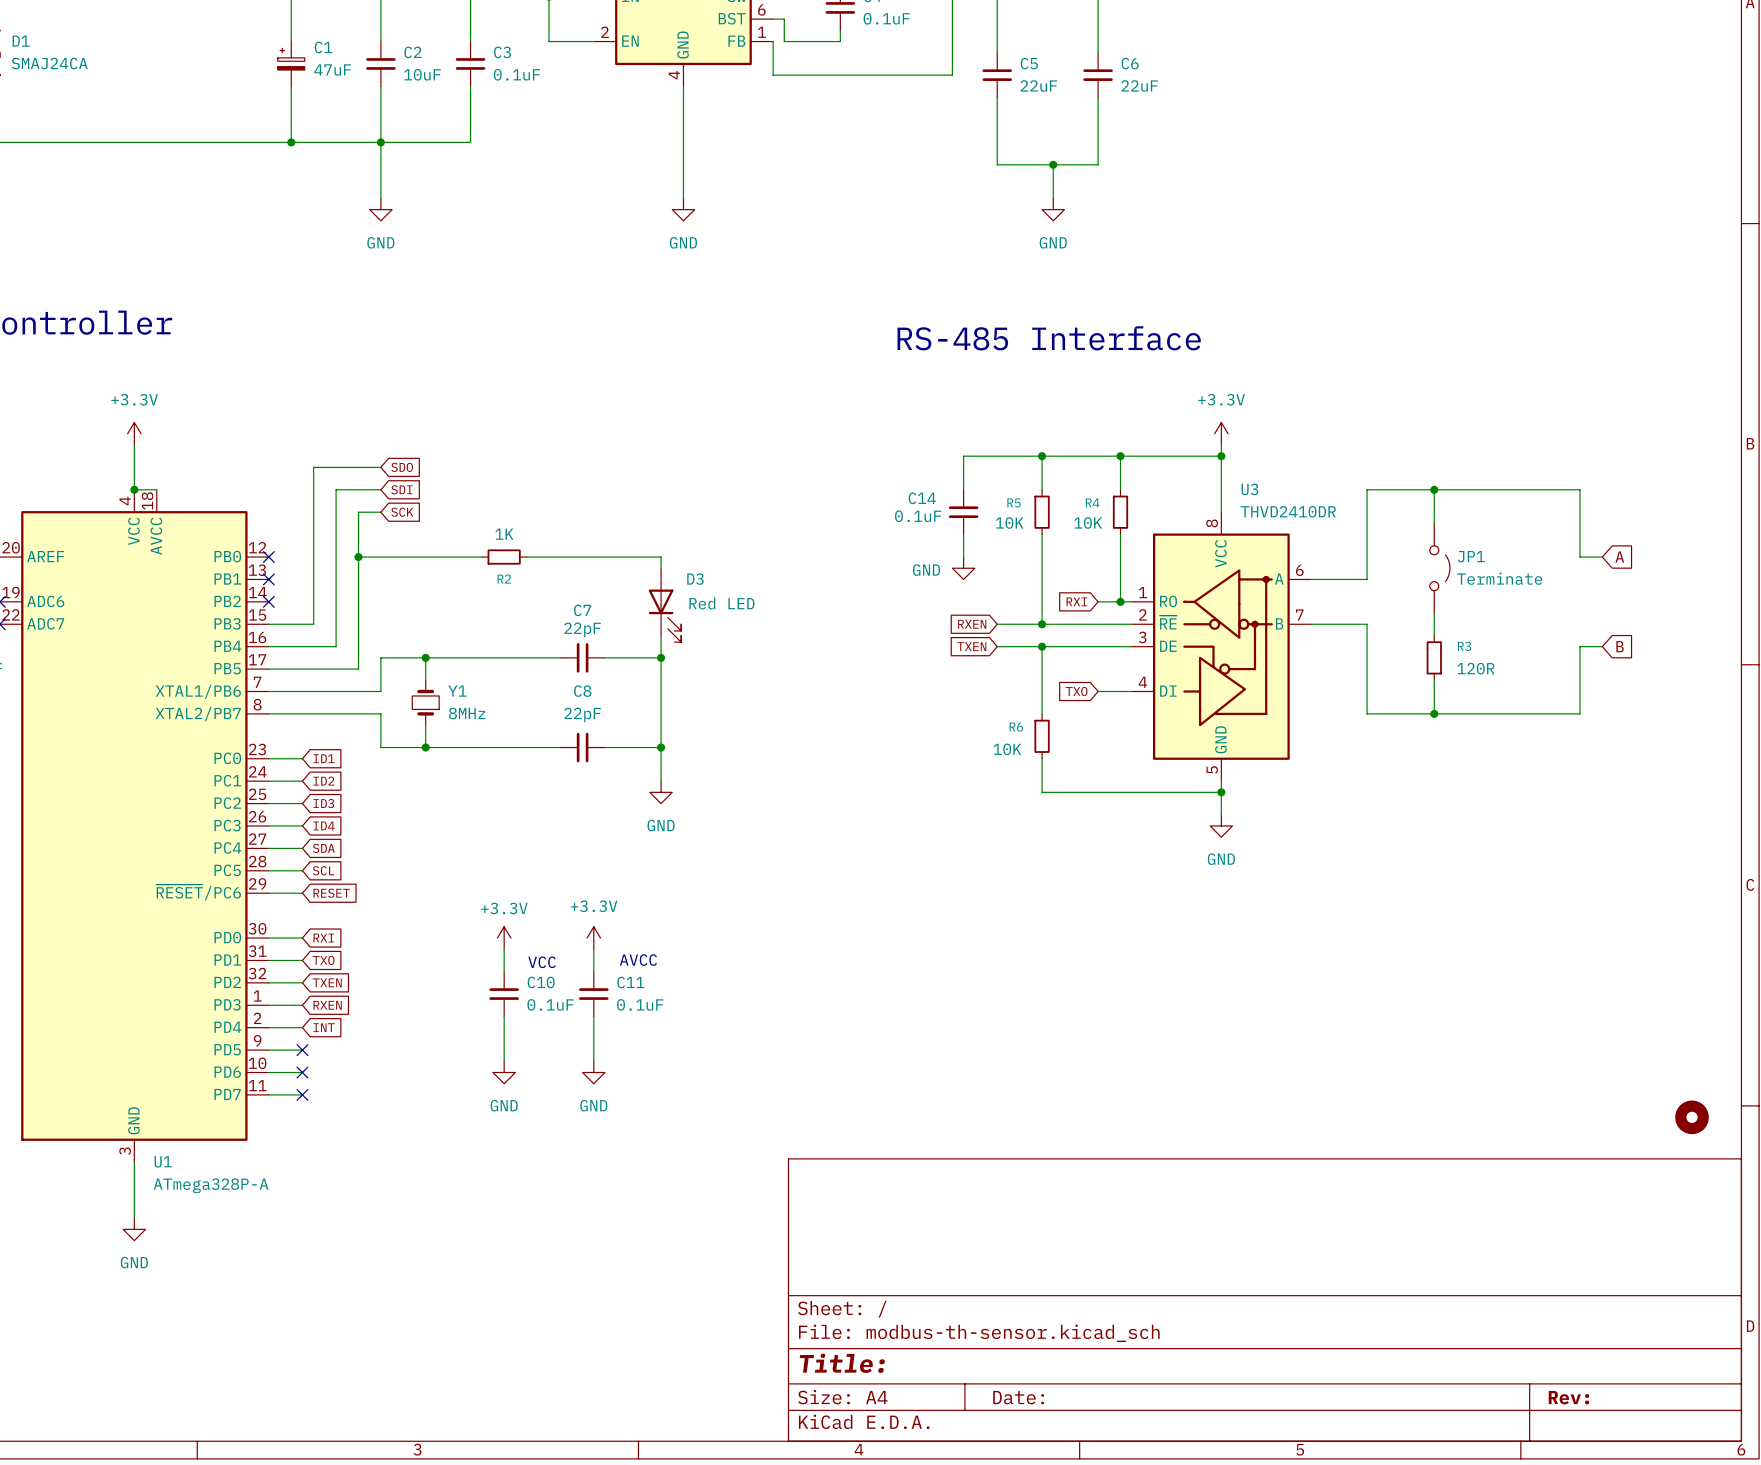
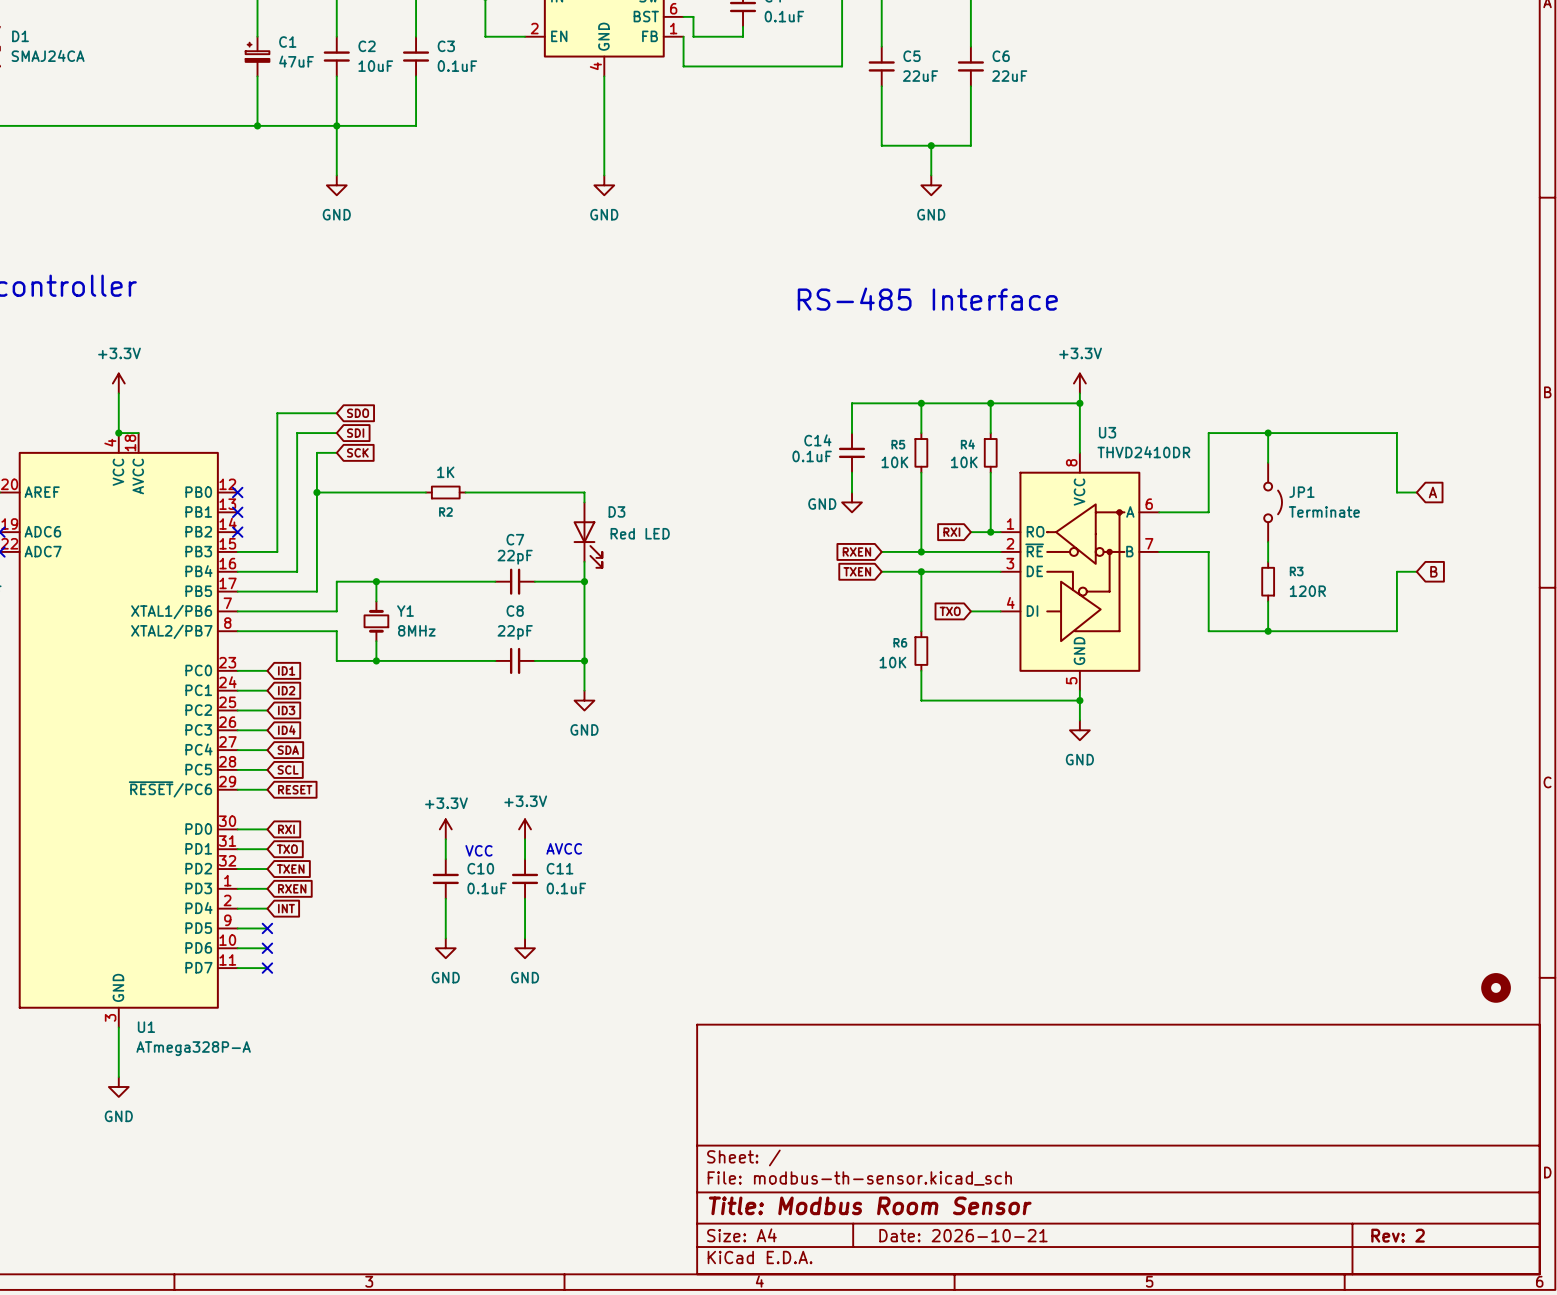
title block: Title: (842, 1363) -> Title: Modbus Room Sensor (870, 1205)
title block: Date: (1018, 1397) -> Date: 2026-10-21 (963, 1235)
title block: Rev: (1568, 1397) -> Rev: 2 (1398, 1235)

